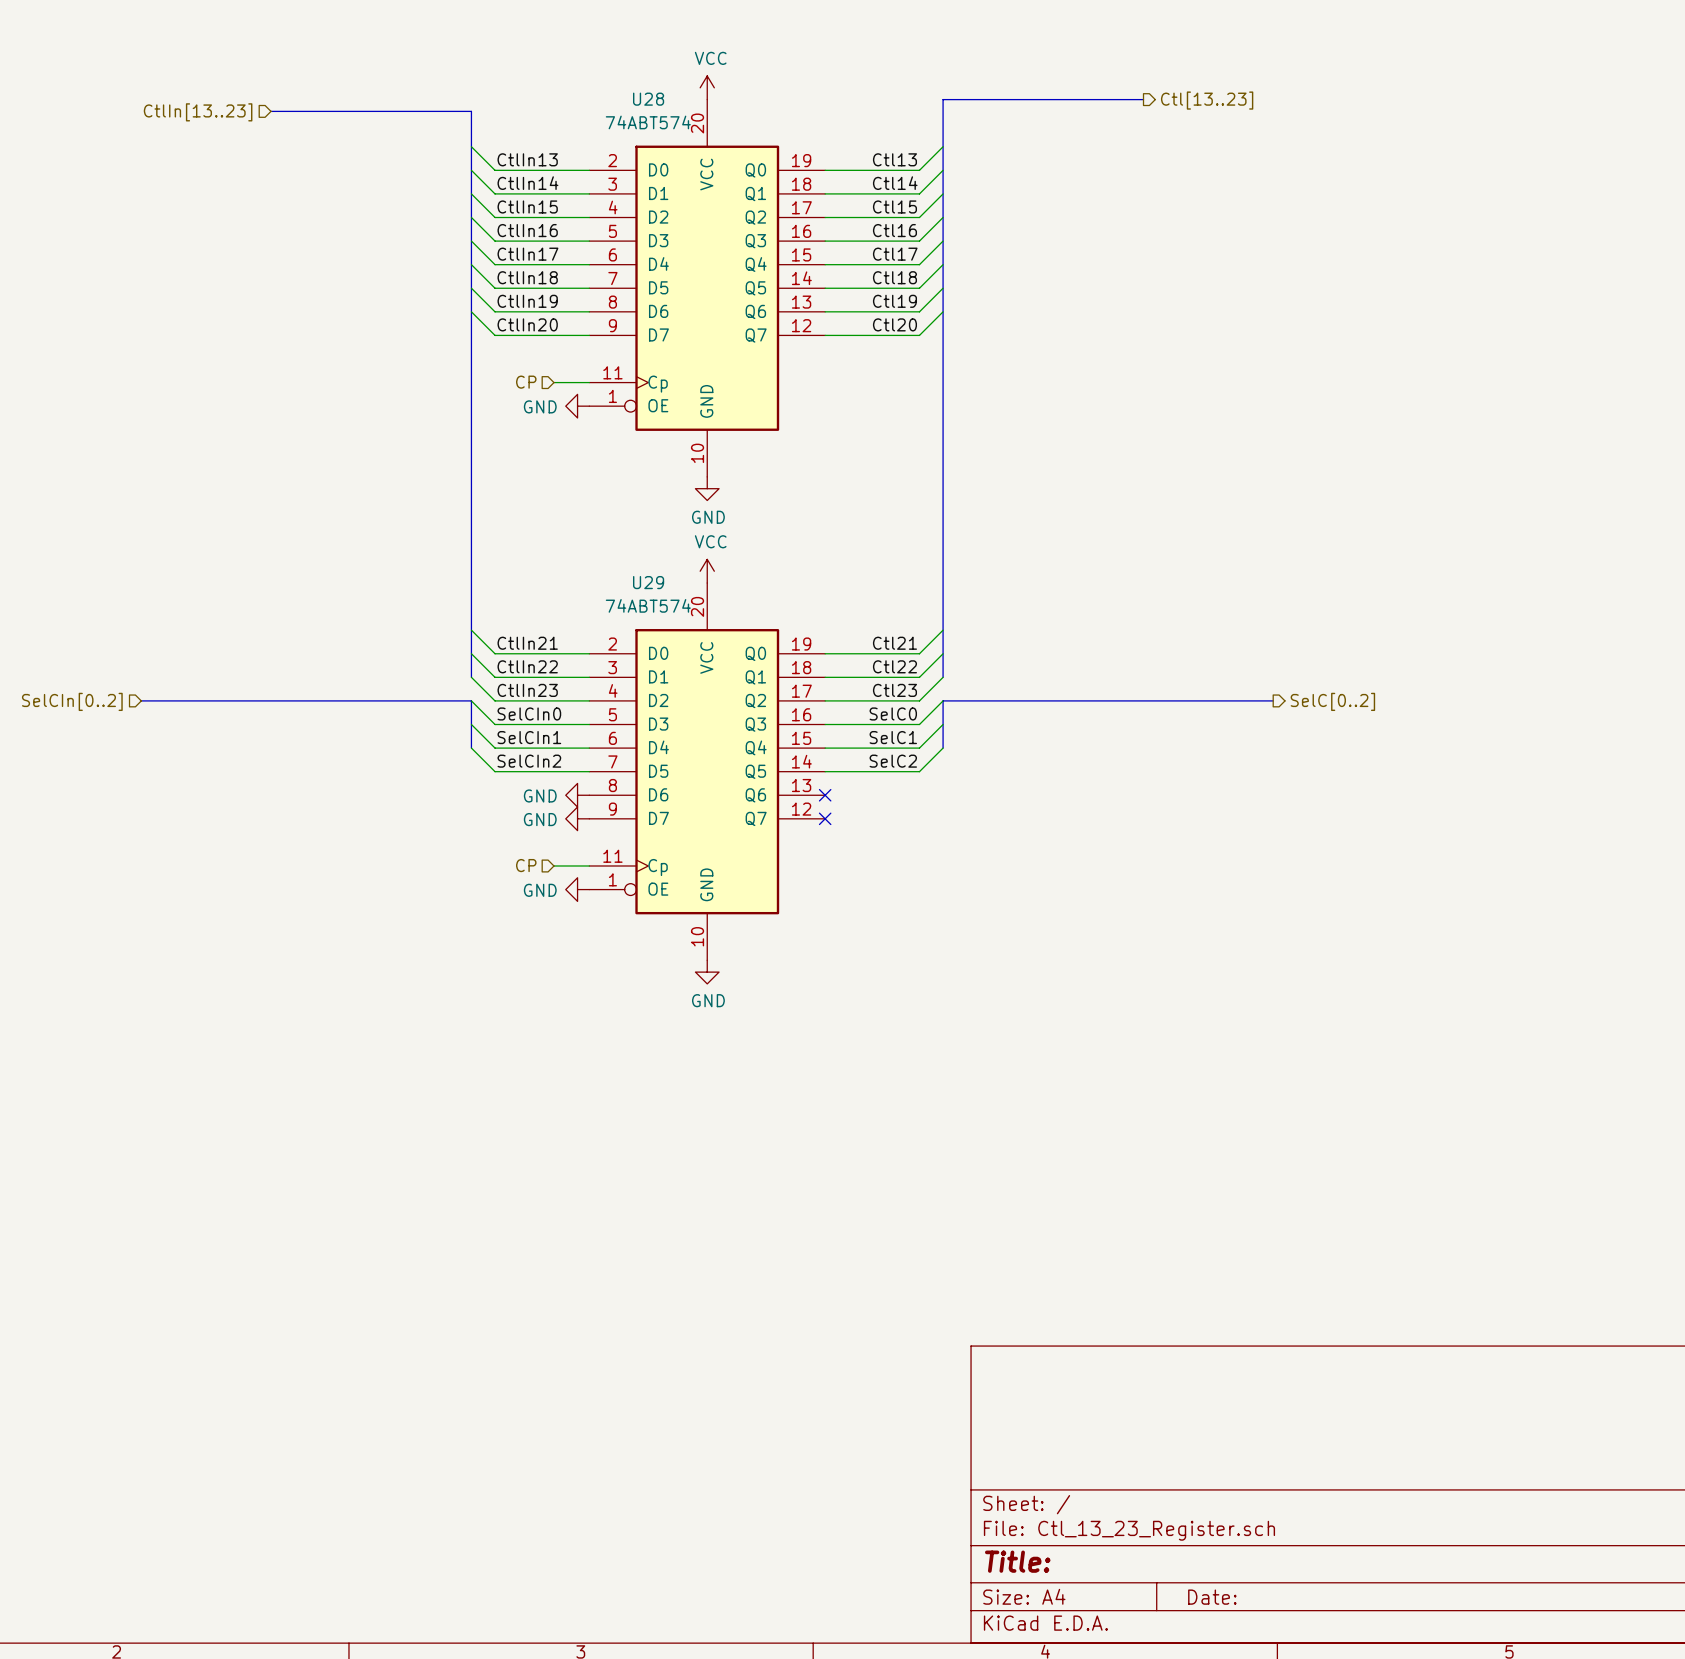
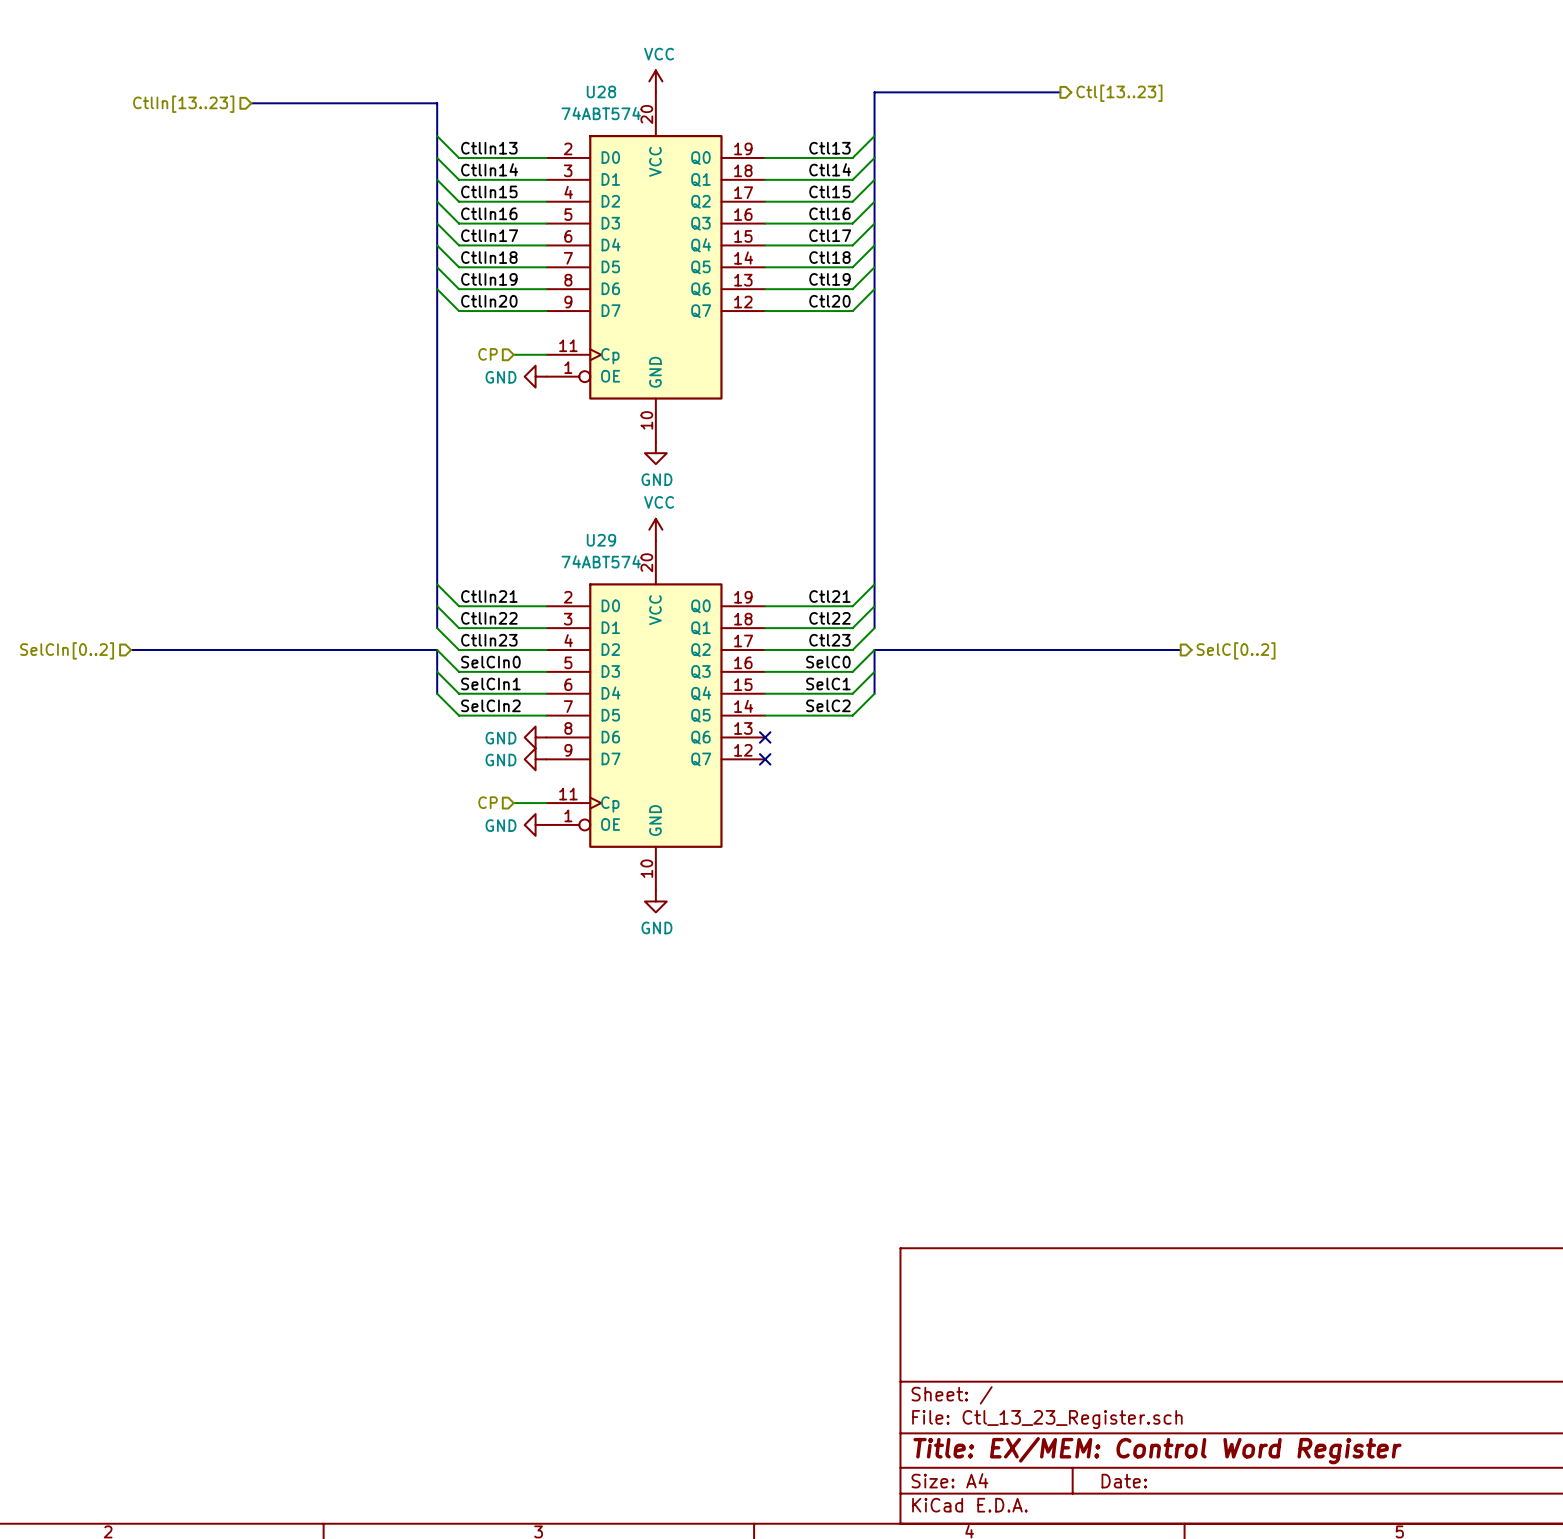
title block: Title: (1017, 1561) -> Title: EX/MEM: Control Word Register (1157, 1450)

